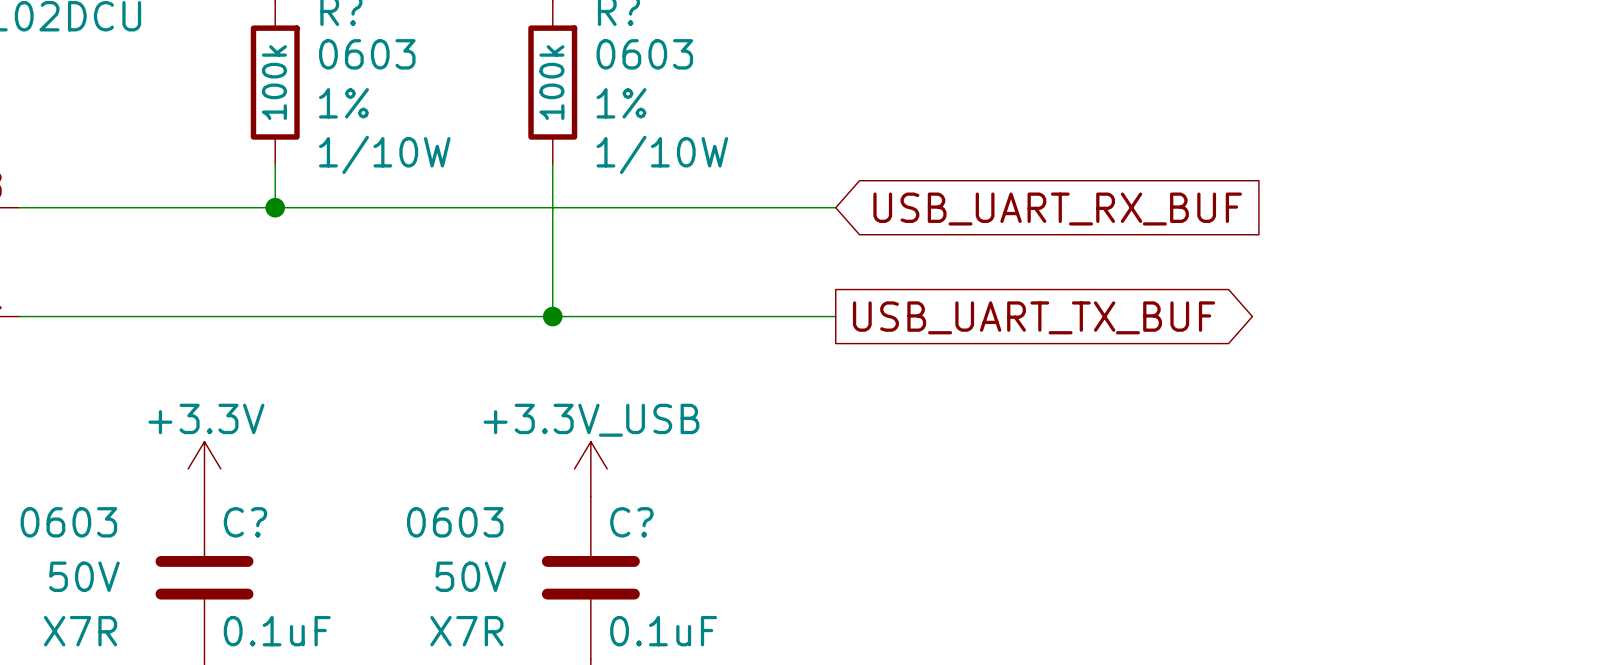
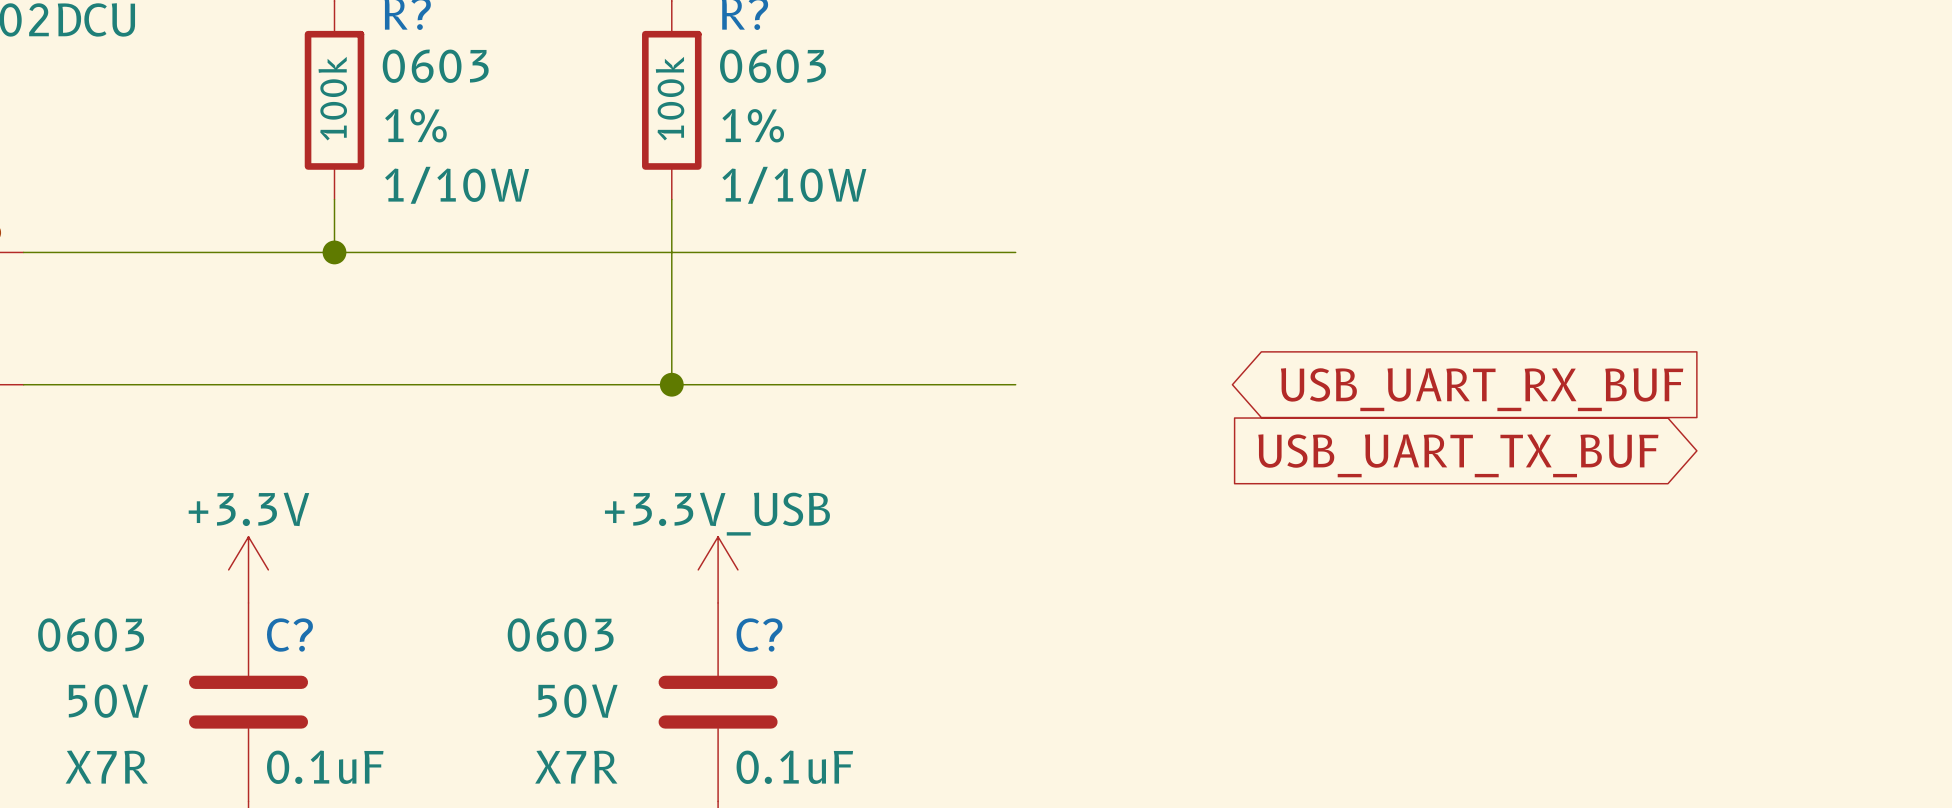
global label: USB_UART_RX_BUF (1057, 209) -> none
global label: USB_UART_TX_BUF (1034, 317) -> none
global label: none -> USB_UART_RX_BUF (1482, 389)
global label: none -> USB_UART_TX_BUF (1458, 455)

